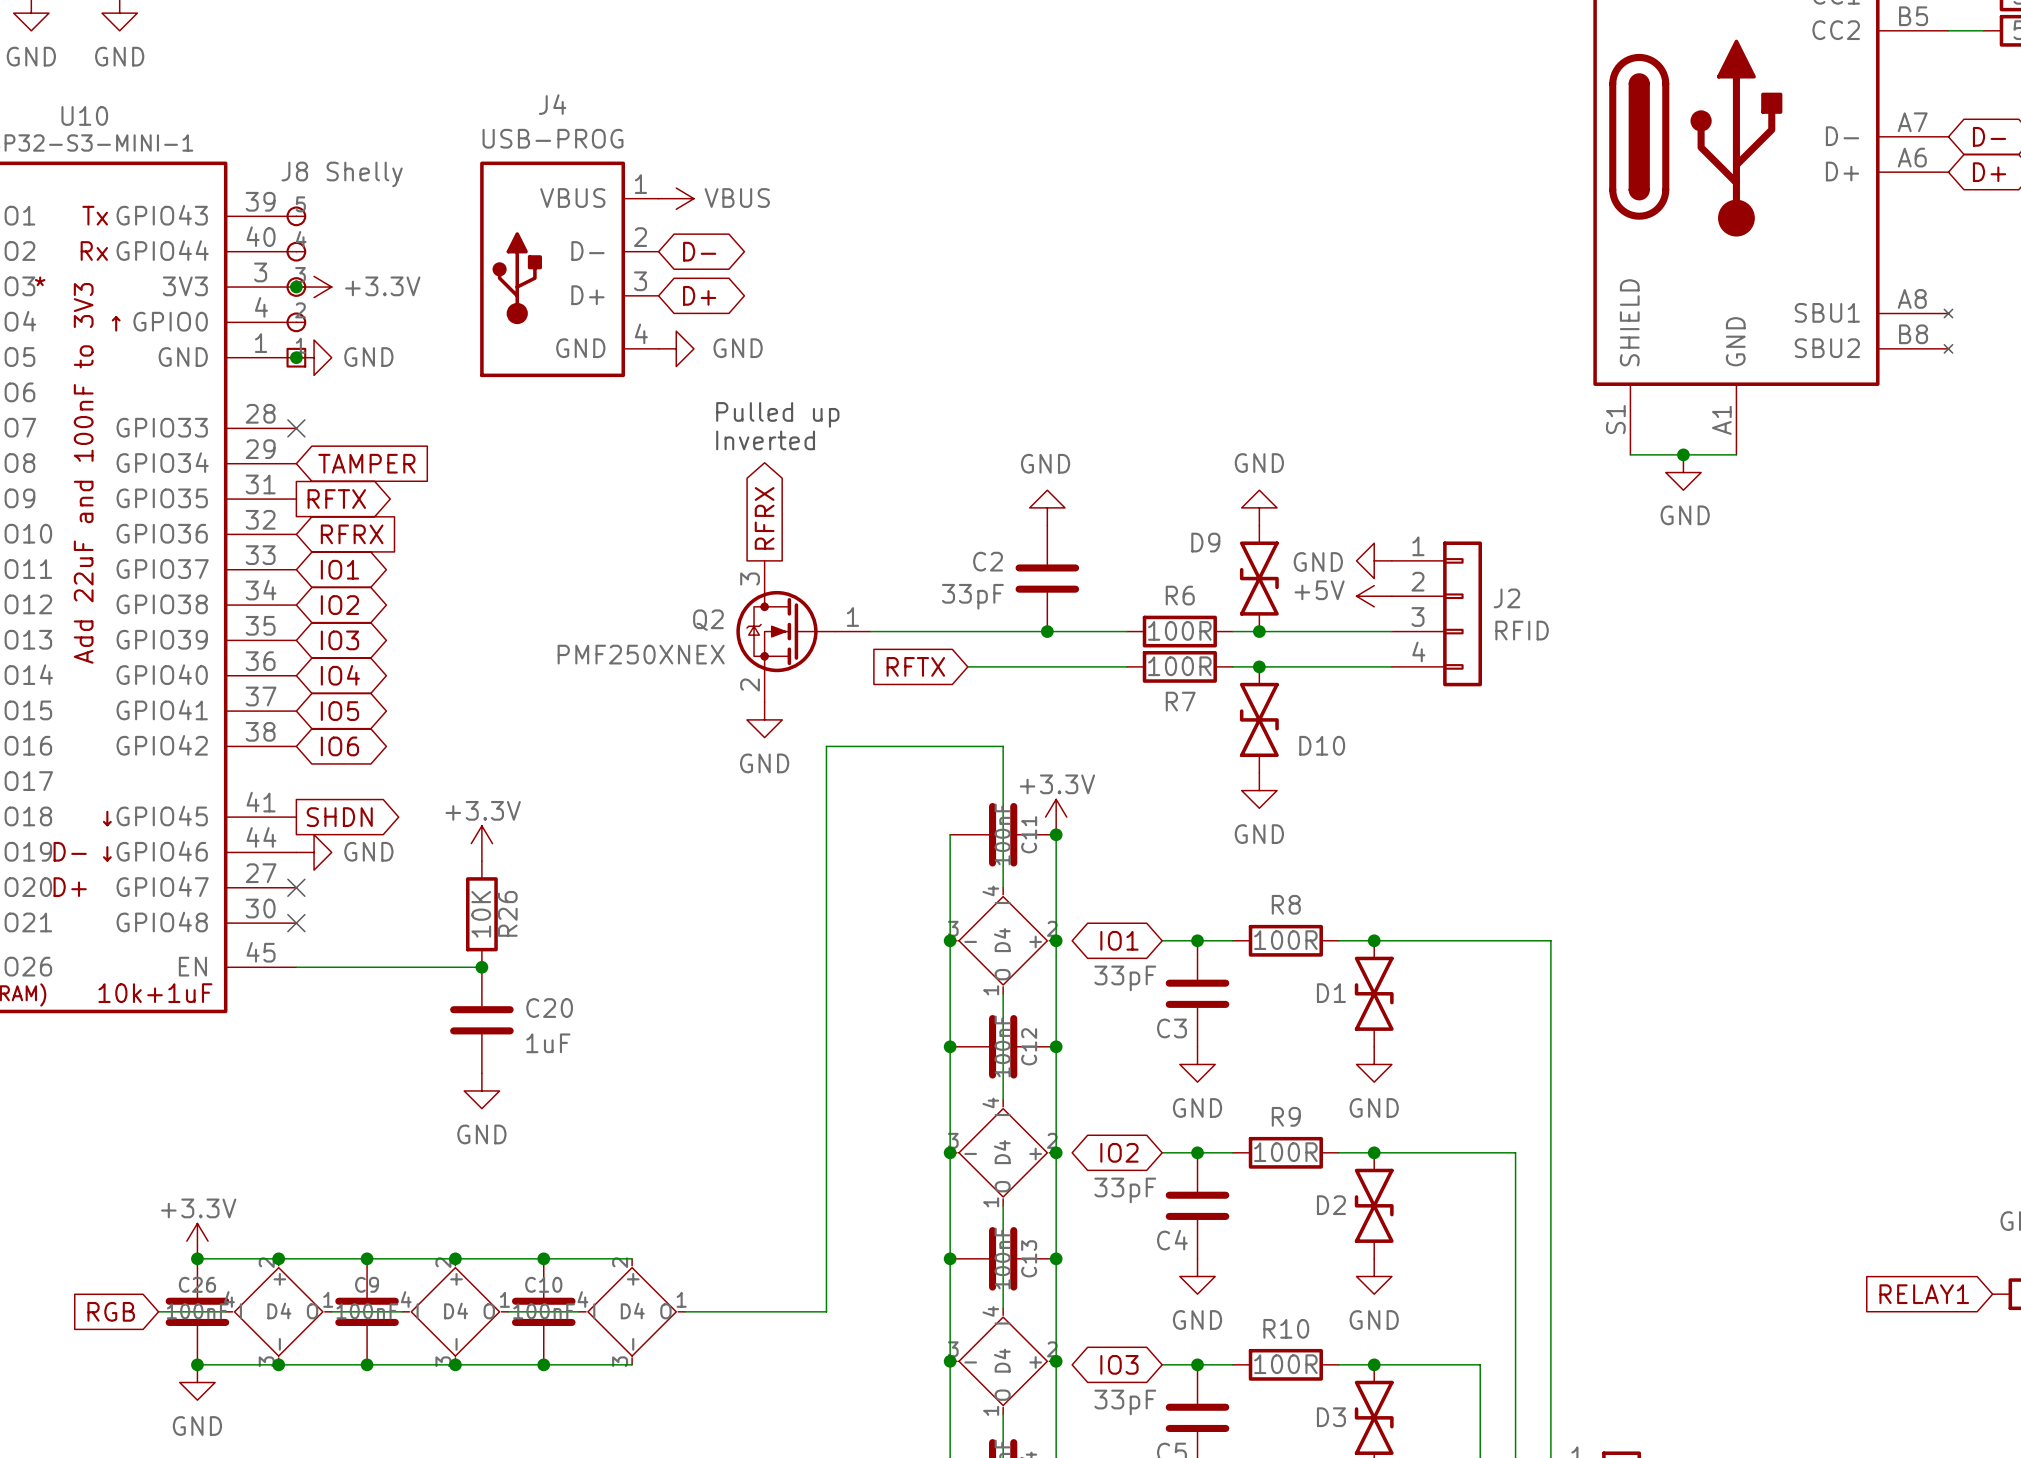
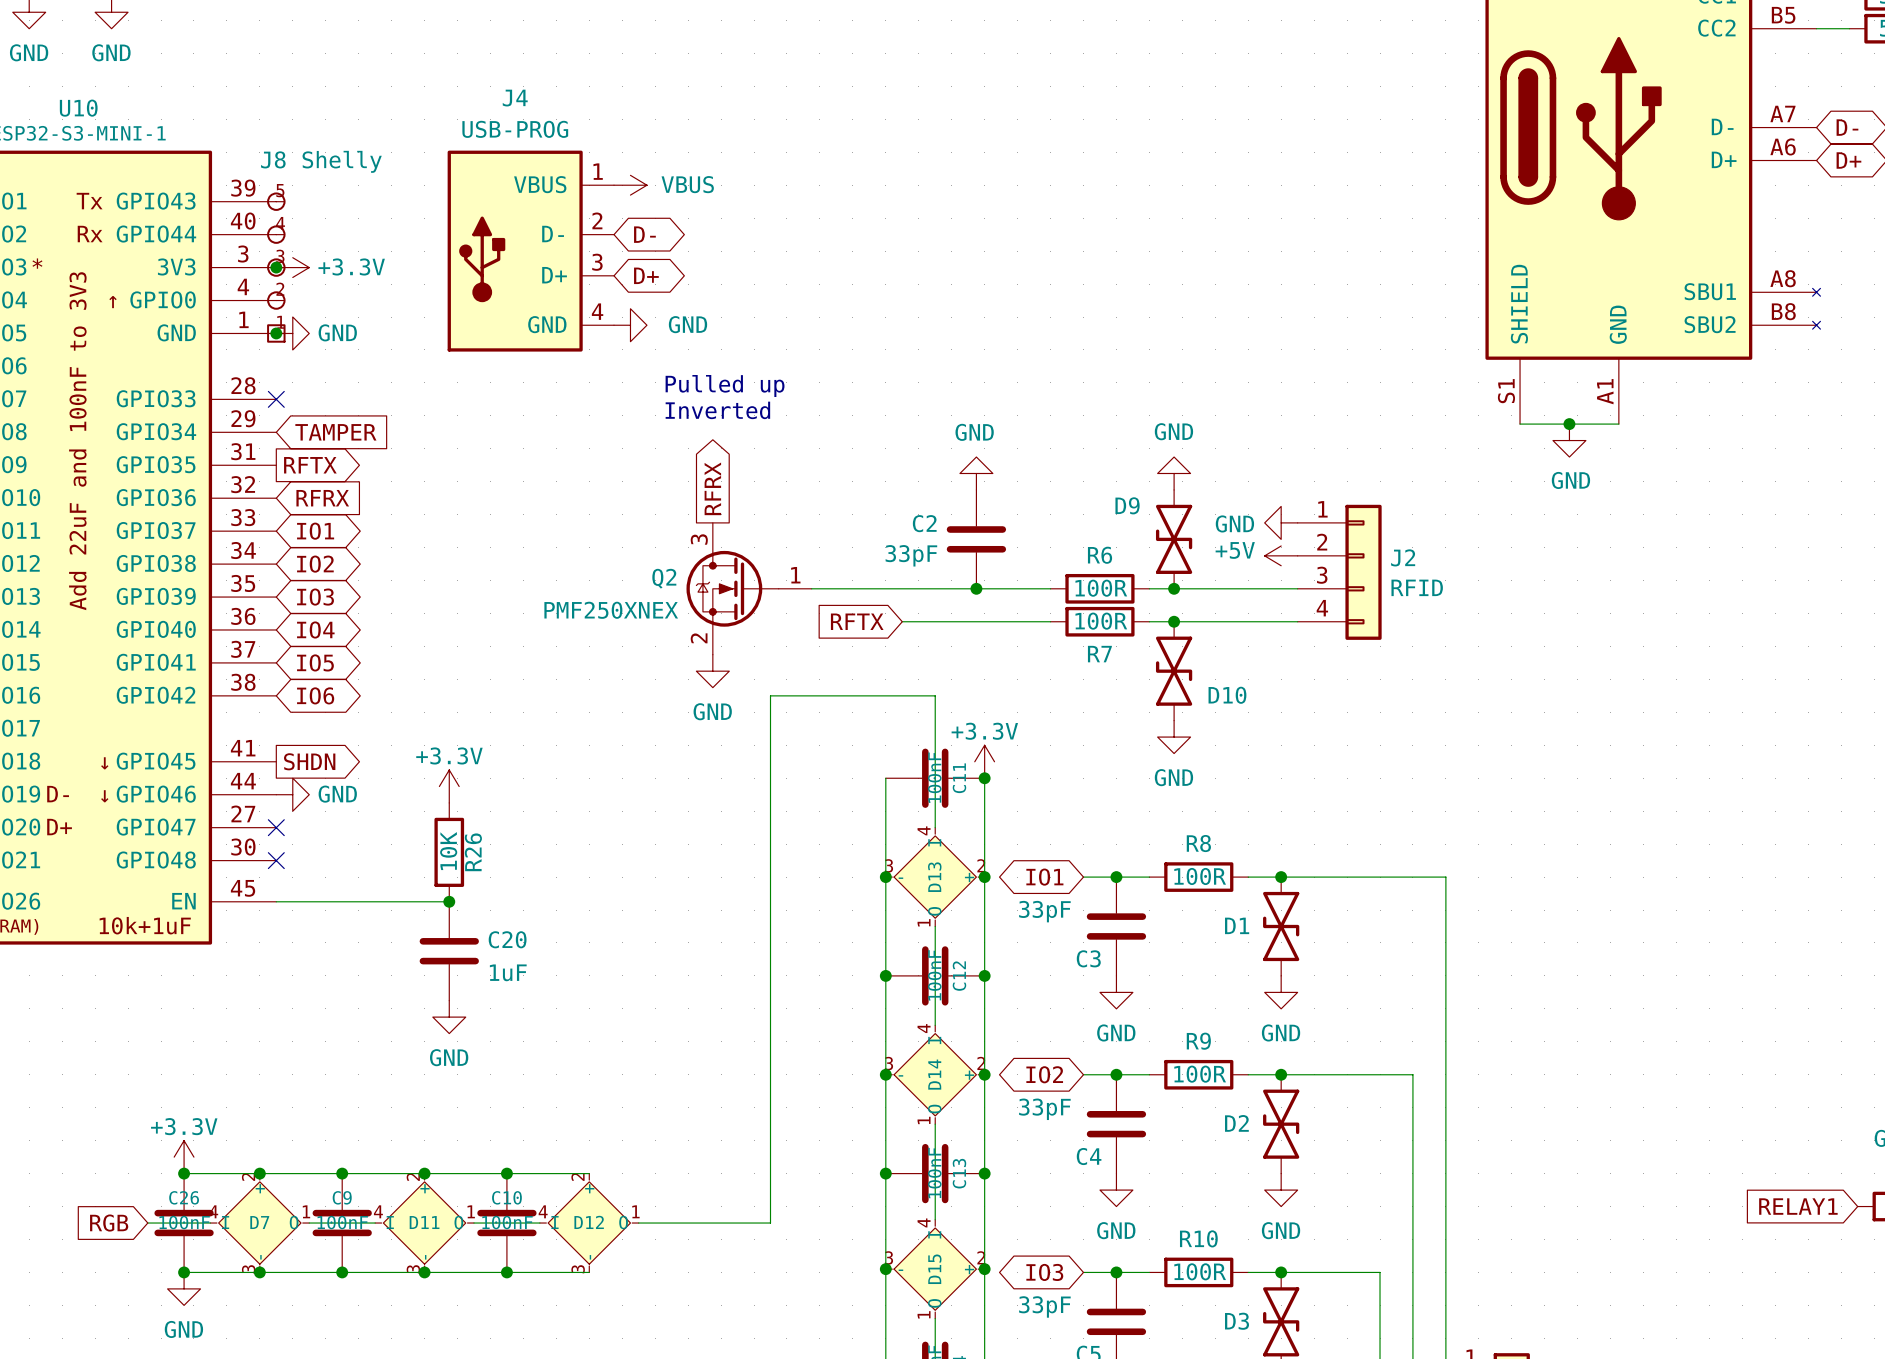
D4 name: D4 (1002, 940) -> D13 (934, 877)
D4 name: D4 (1002, 1152) -> D14 (934, 1074)
D4 name: D4 (279, 1310) -> D7 (259, 1222)
D4 name: D4 (456, 1310) -> D11 (424, 1222)
D4 name: D4 (632, 1310) -> D12 (589, 1222)
D4 name: D4 (1002, 1360) -> D15 (934, 1269)

